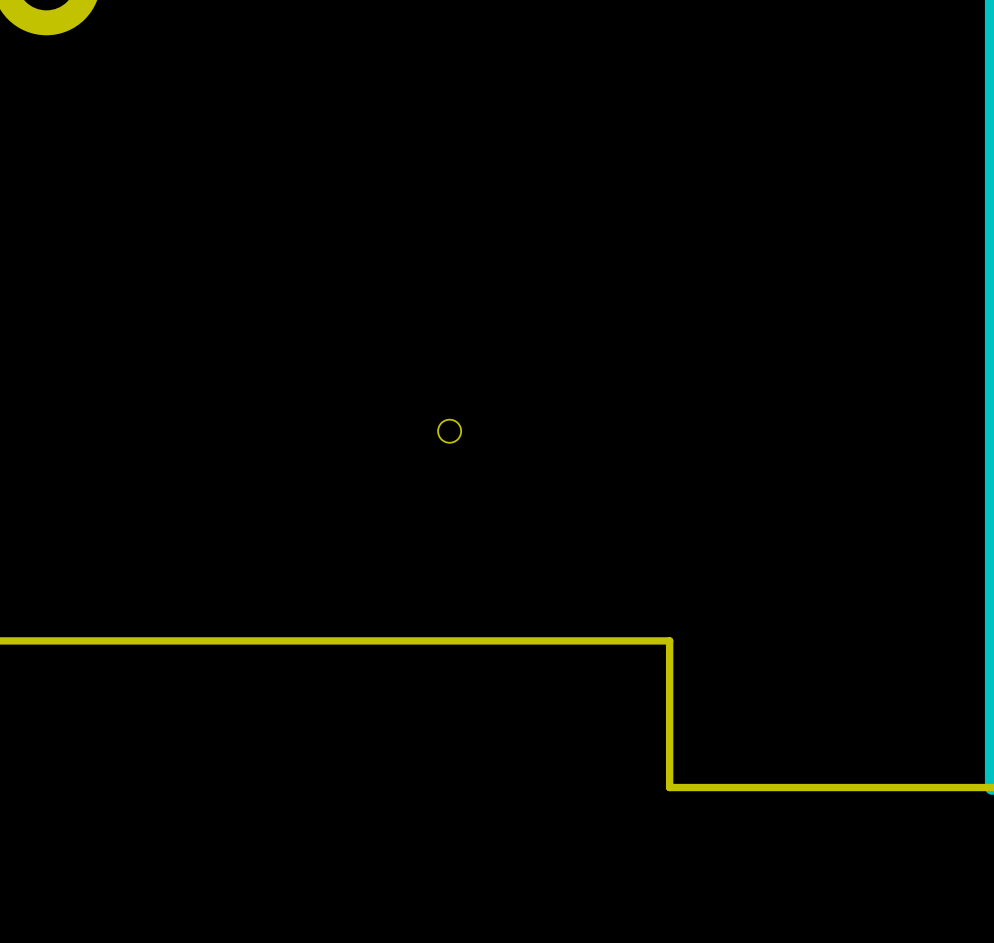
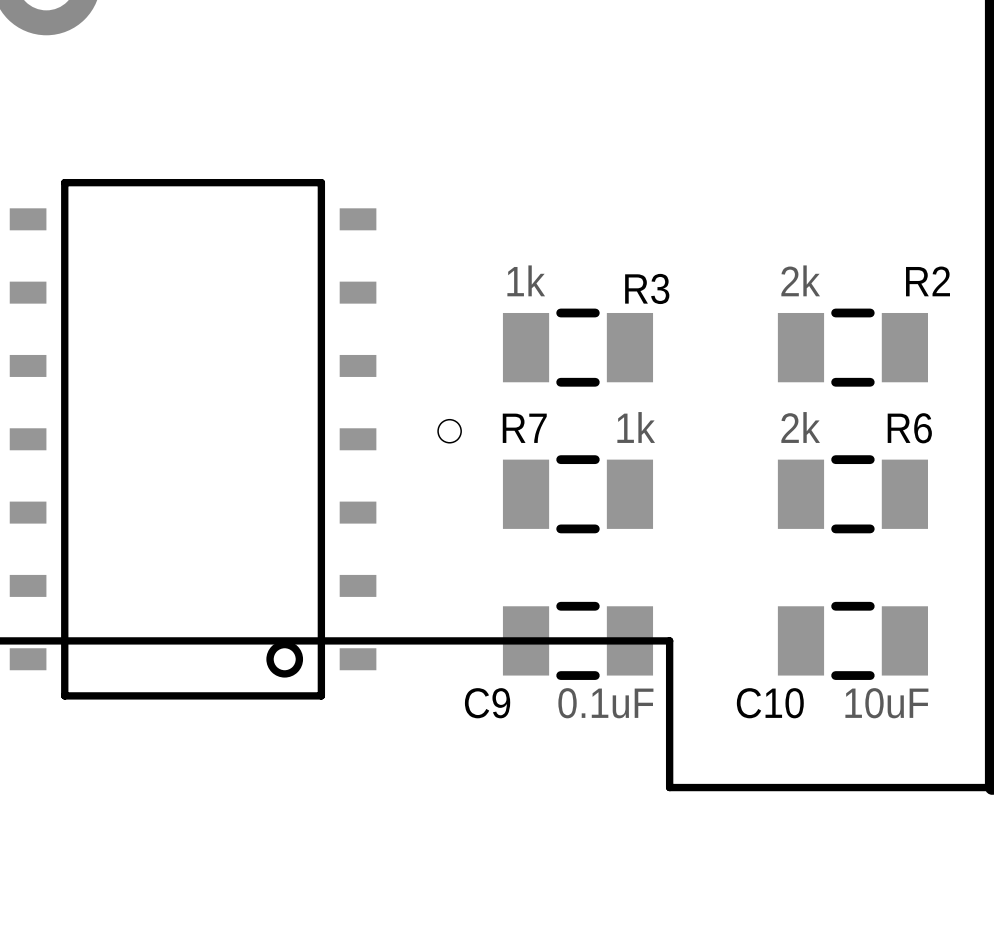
R3: none -> 1k (577, 347)
R2: none -> 2k (852, 347)
part: none -> (193, 439)
R7: none -> 1k (577, 494)
R6: none -> 2k (852, 494)
C9: none -> 0.1uF (577, 640)
C10: none -> 10uF (852, 640)

